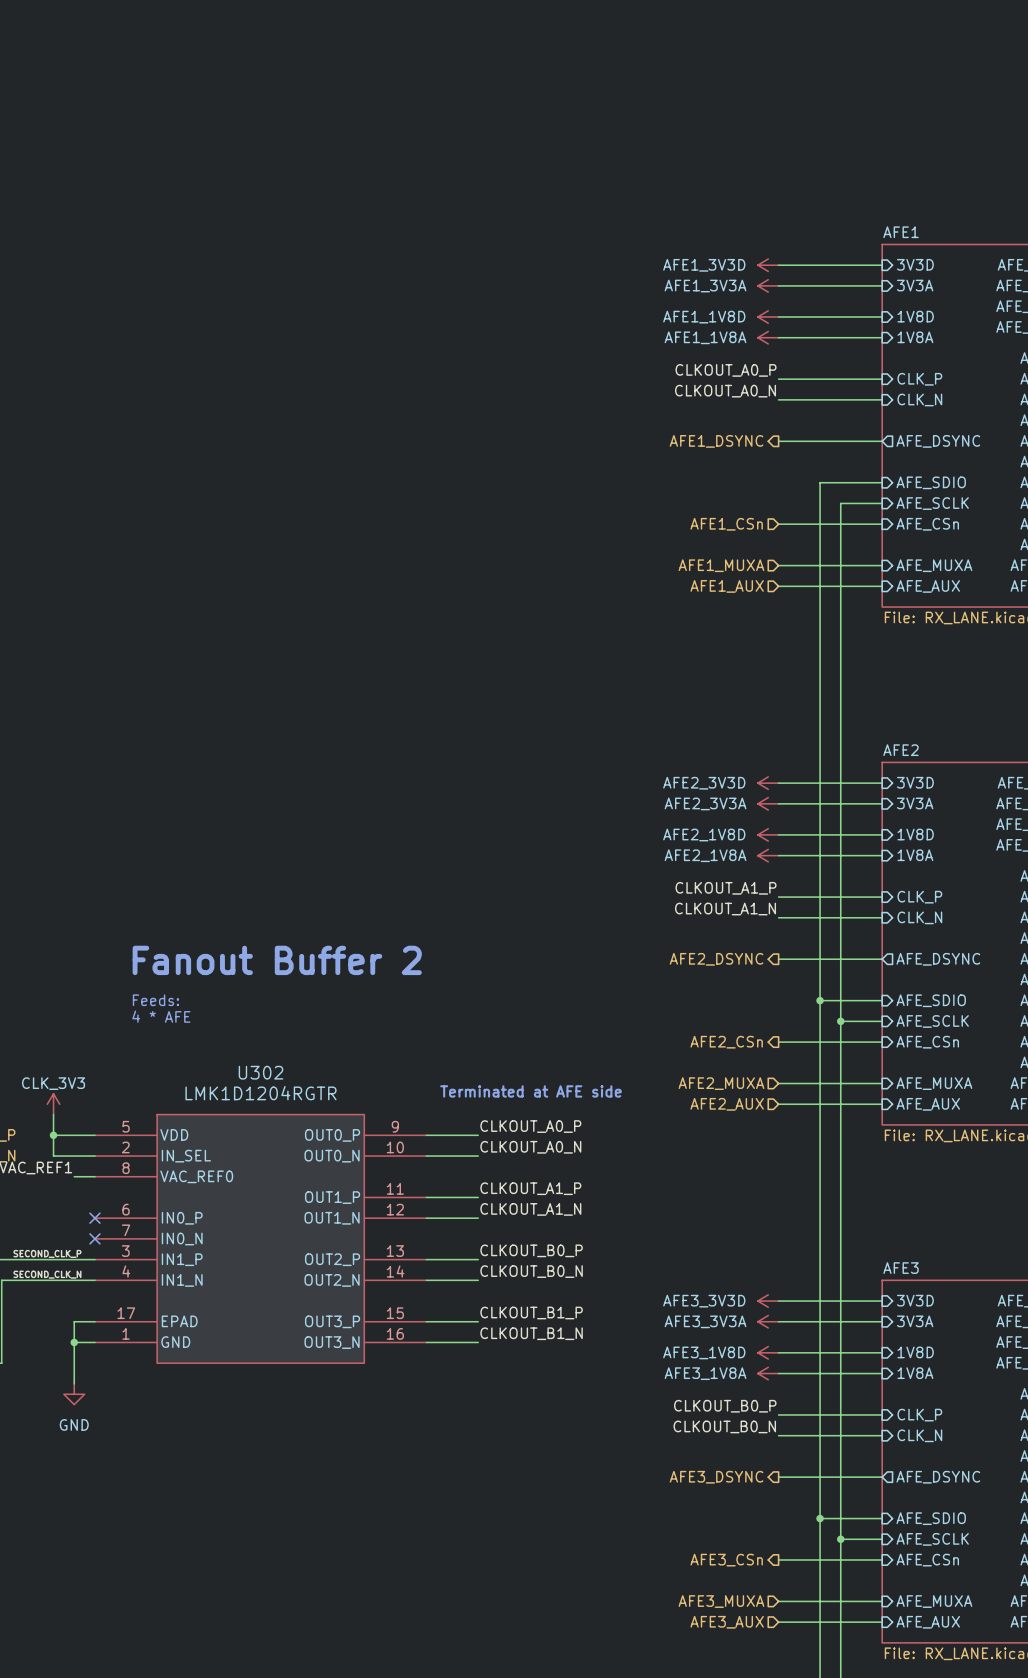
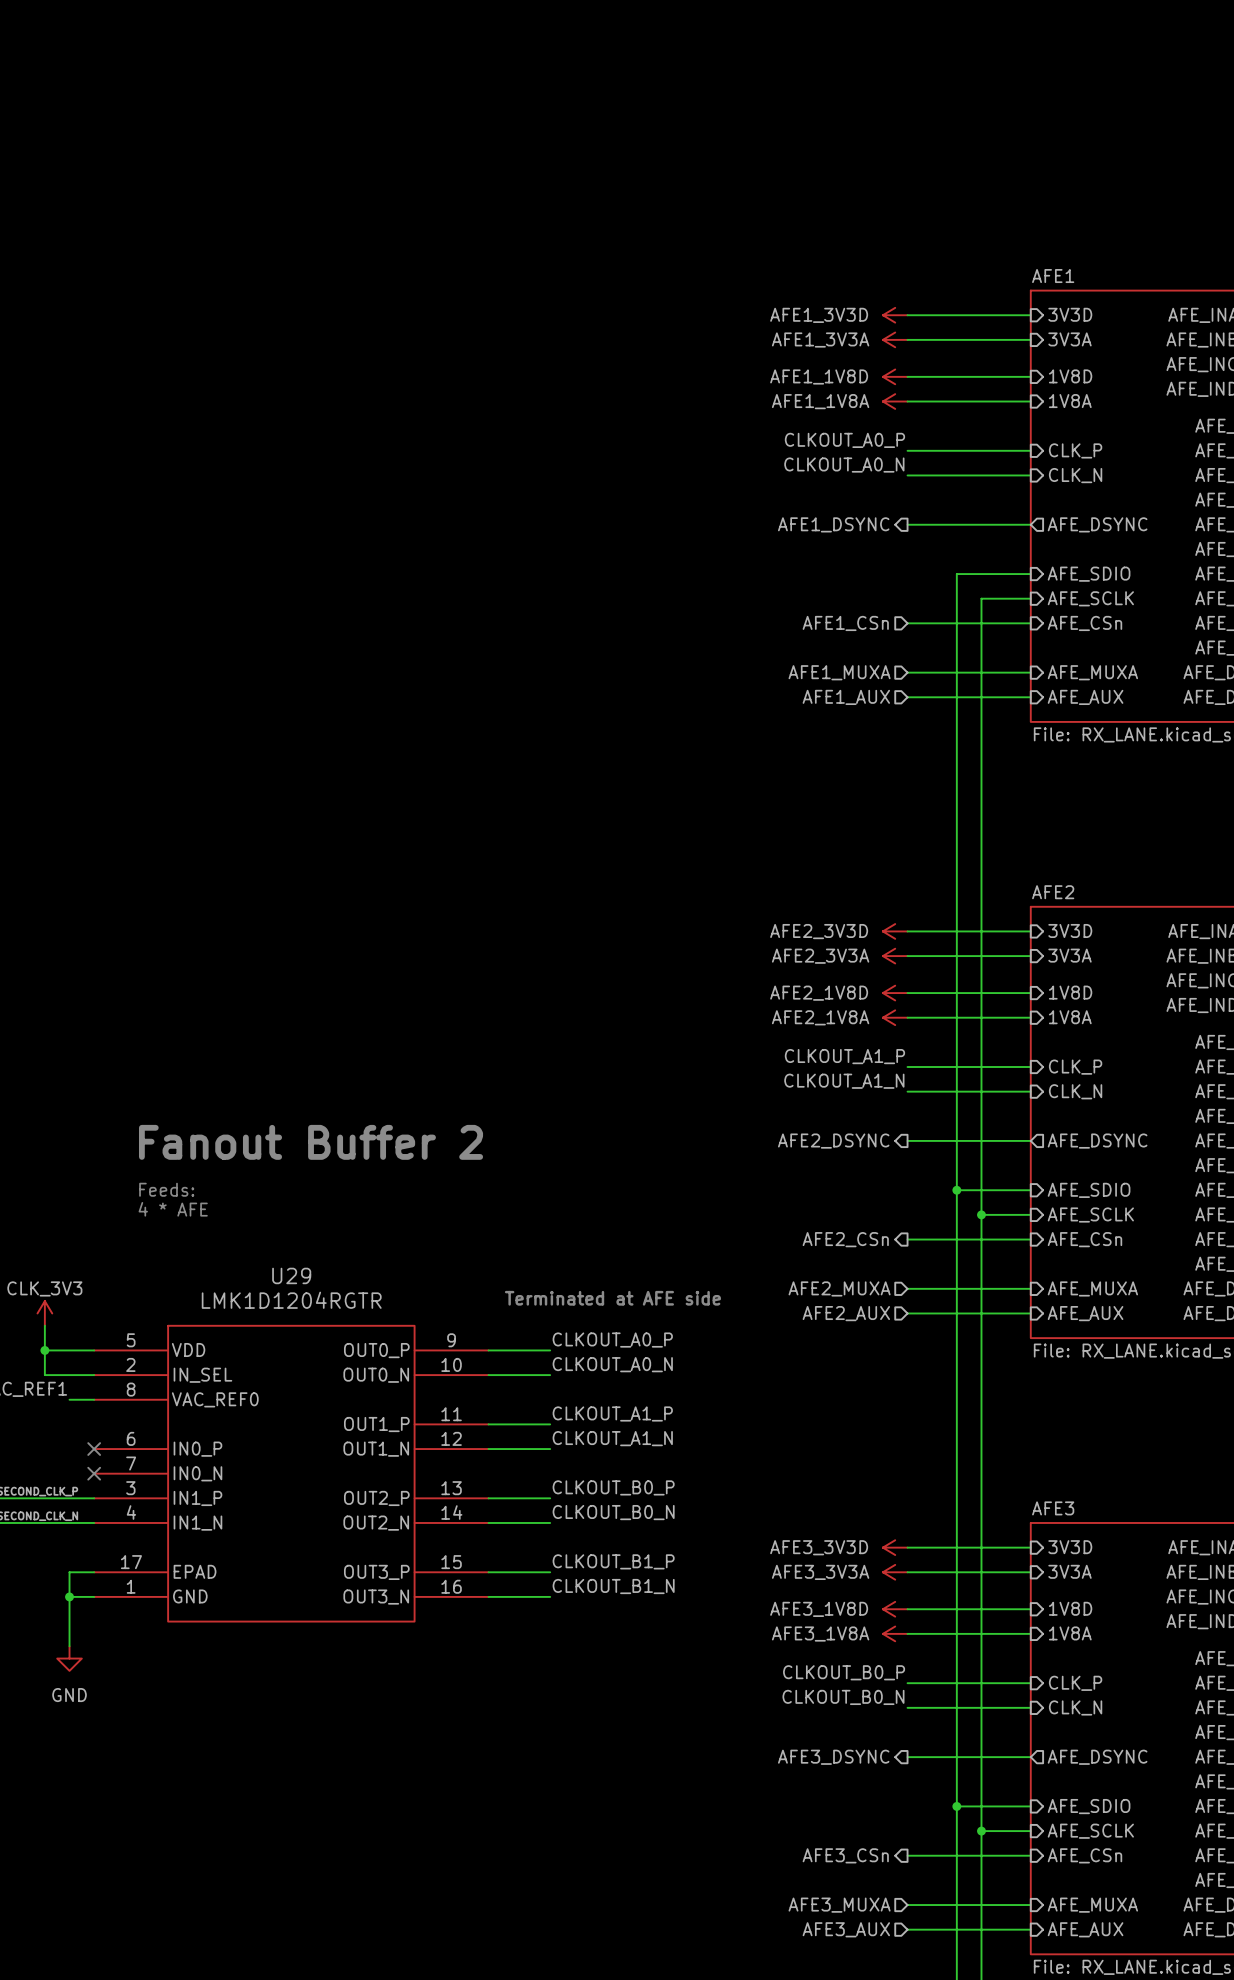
U302 name: U302 (260, 1072) -> U29 (291, 1275)

